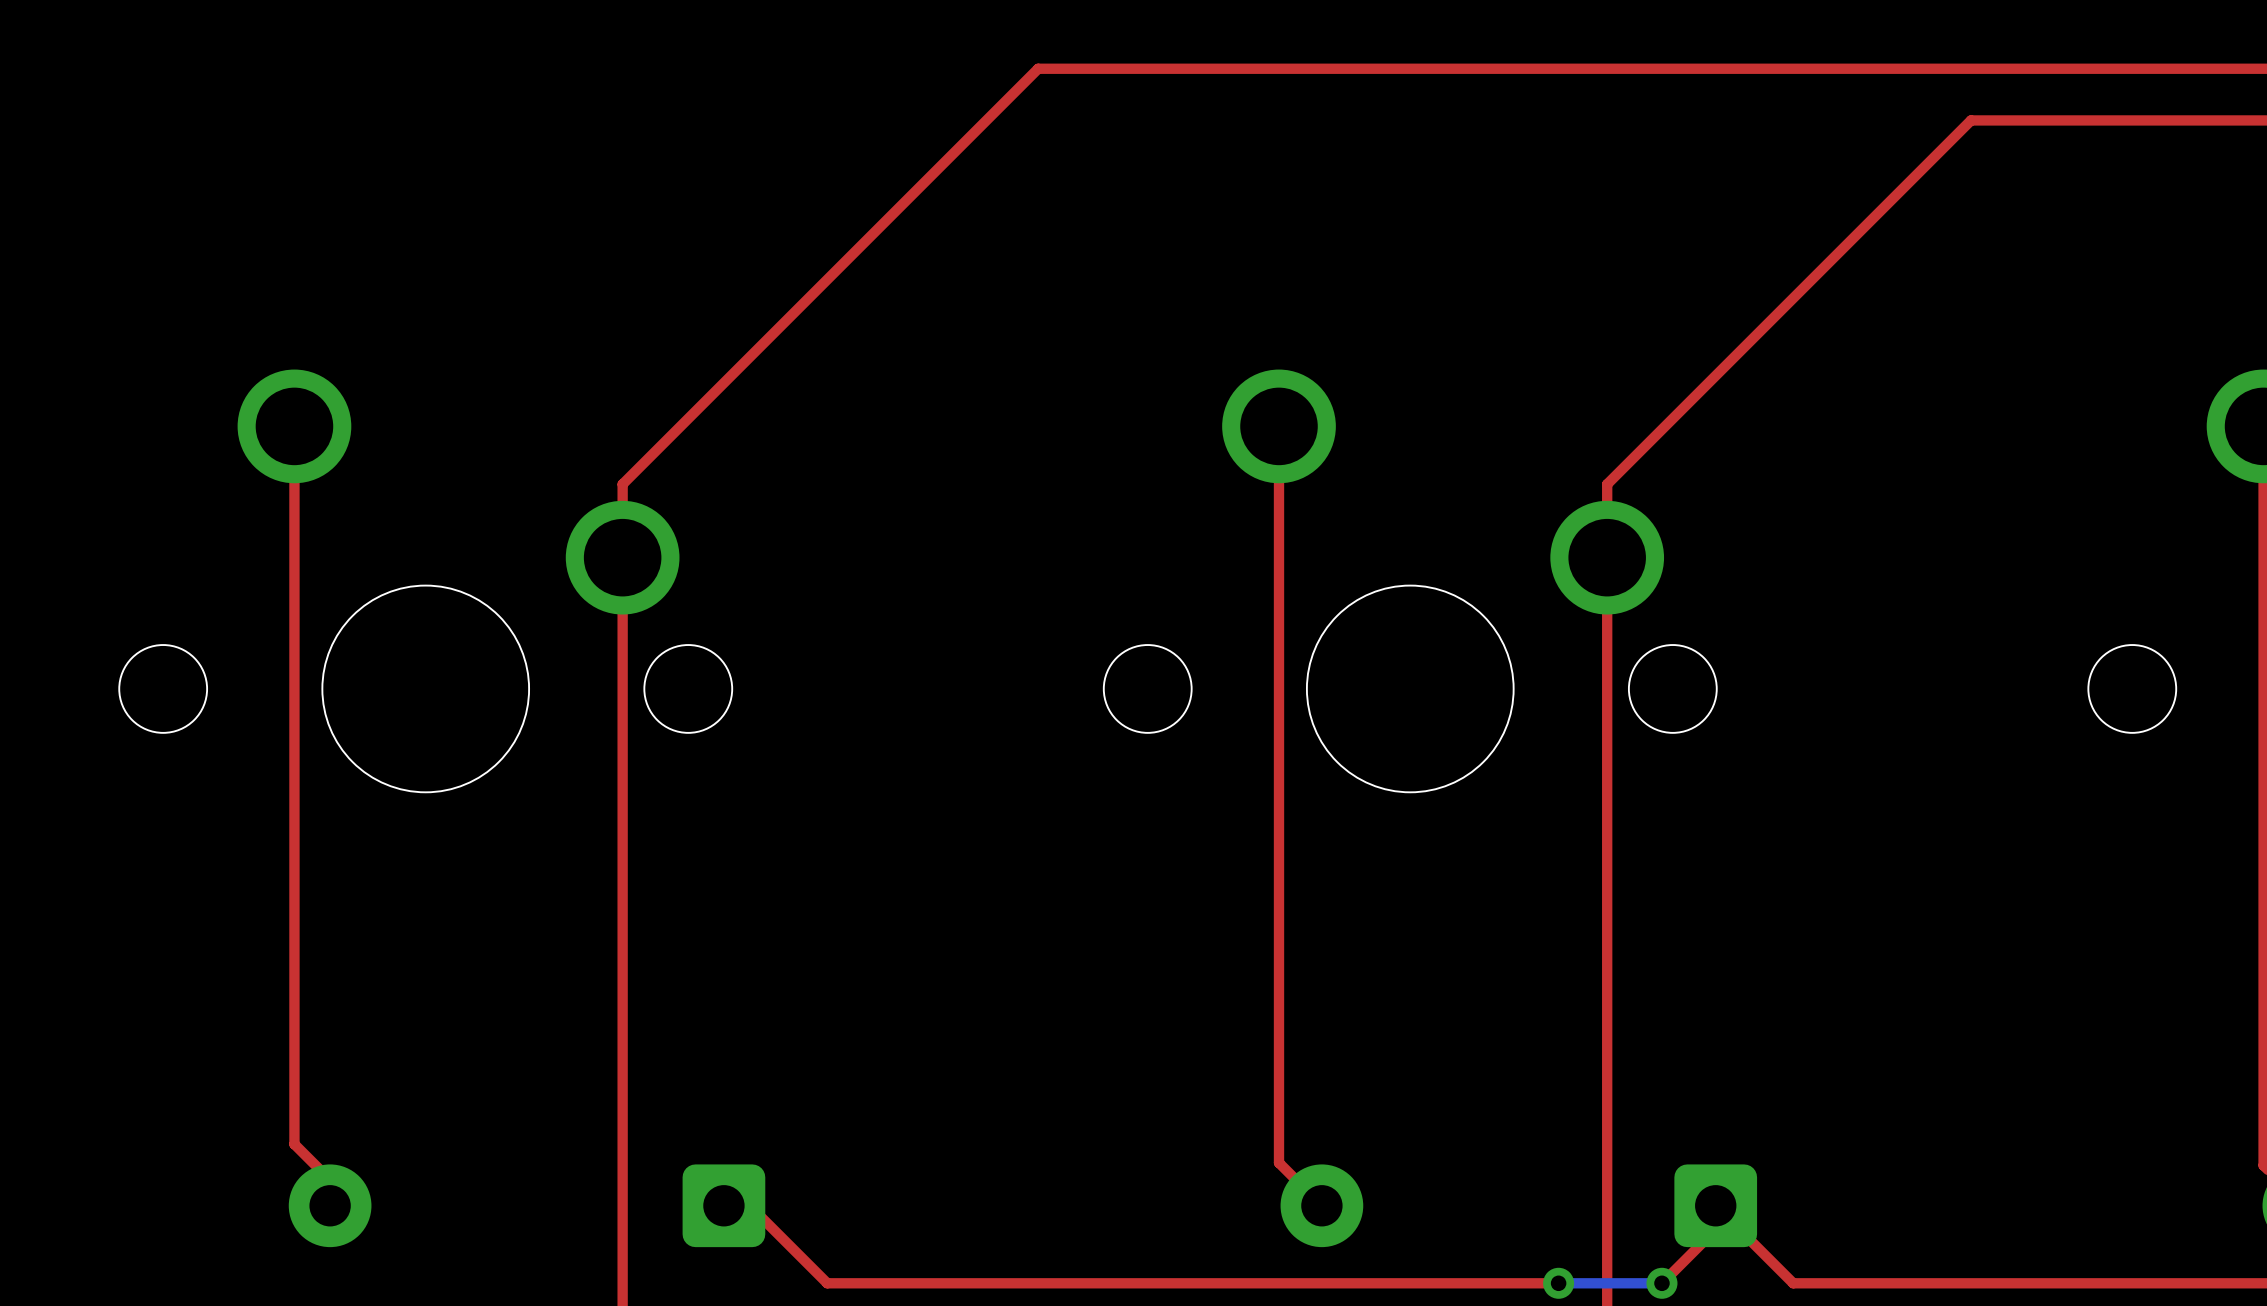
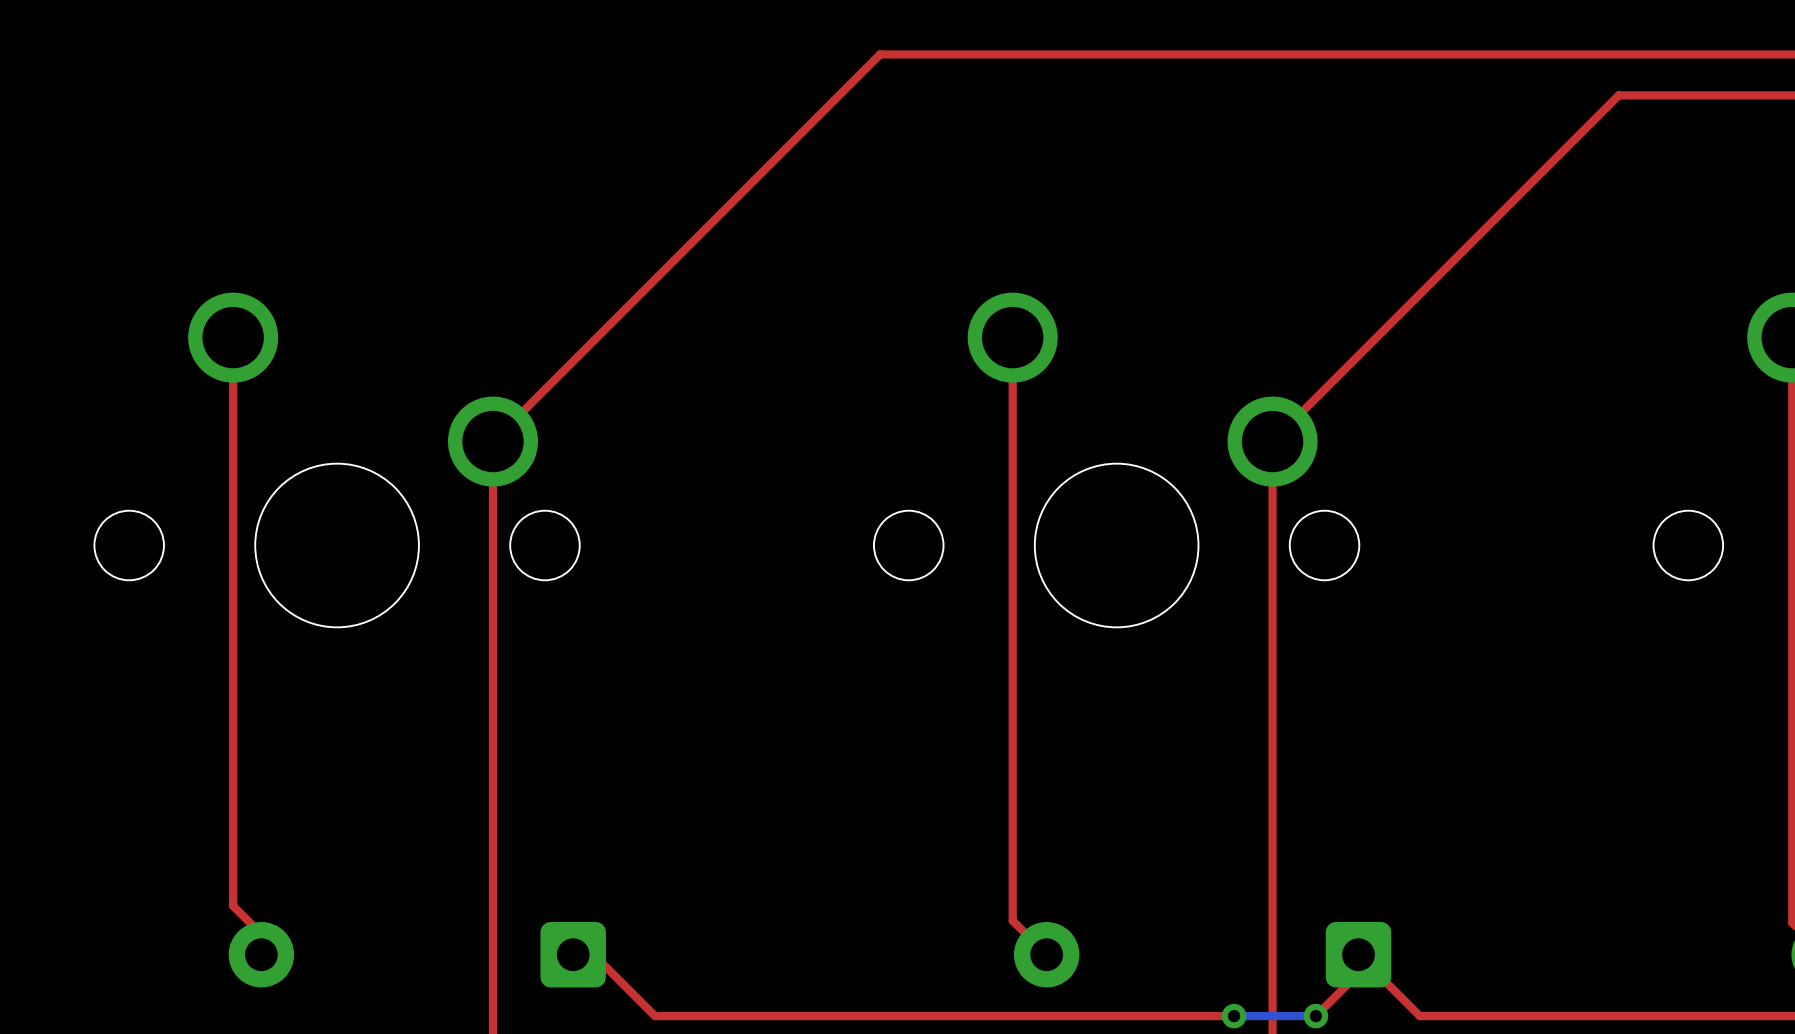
top track: (1111, 68) (1038, 68) (622, 484) (622, 557) -> (880, 54) (493, 441)
top track: (2044, 120) (1971, 120) (1607, 484) (1607, 557) -> (1618, 95) (1272, 441)

